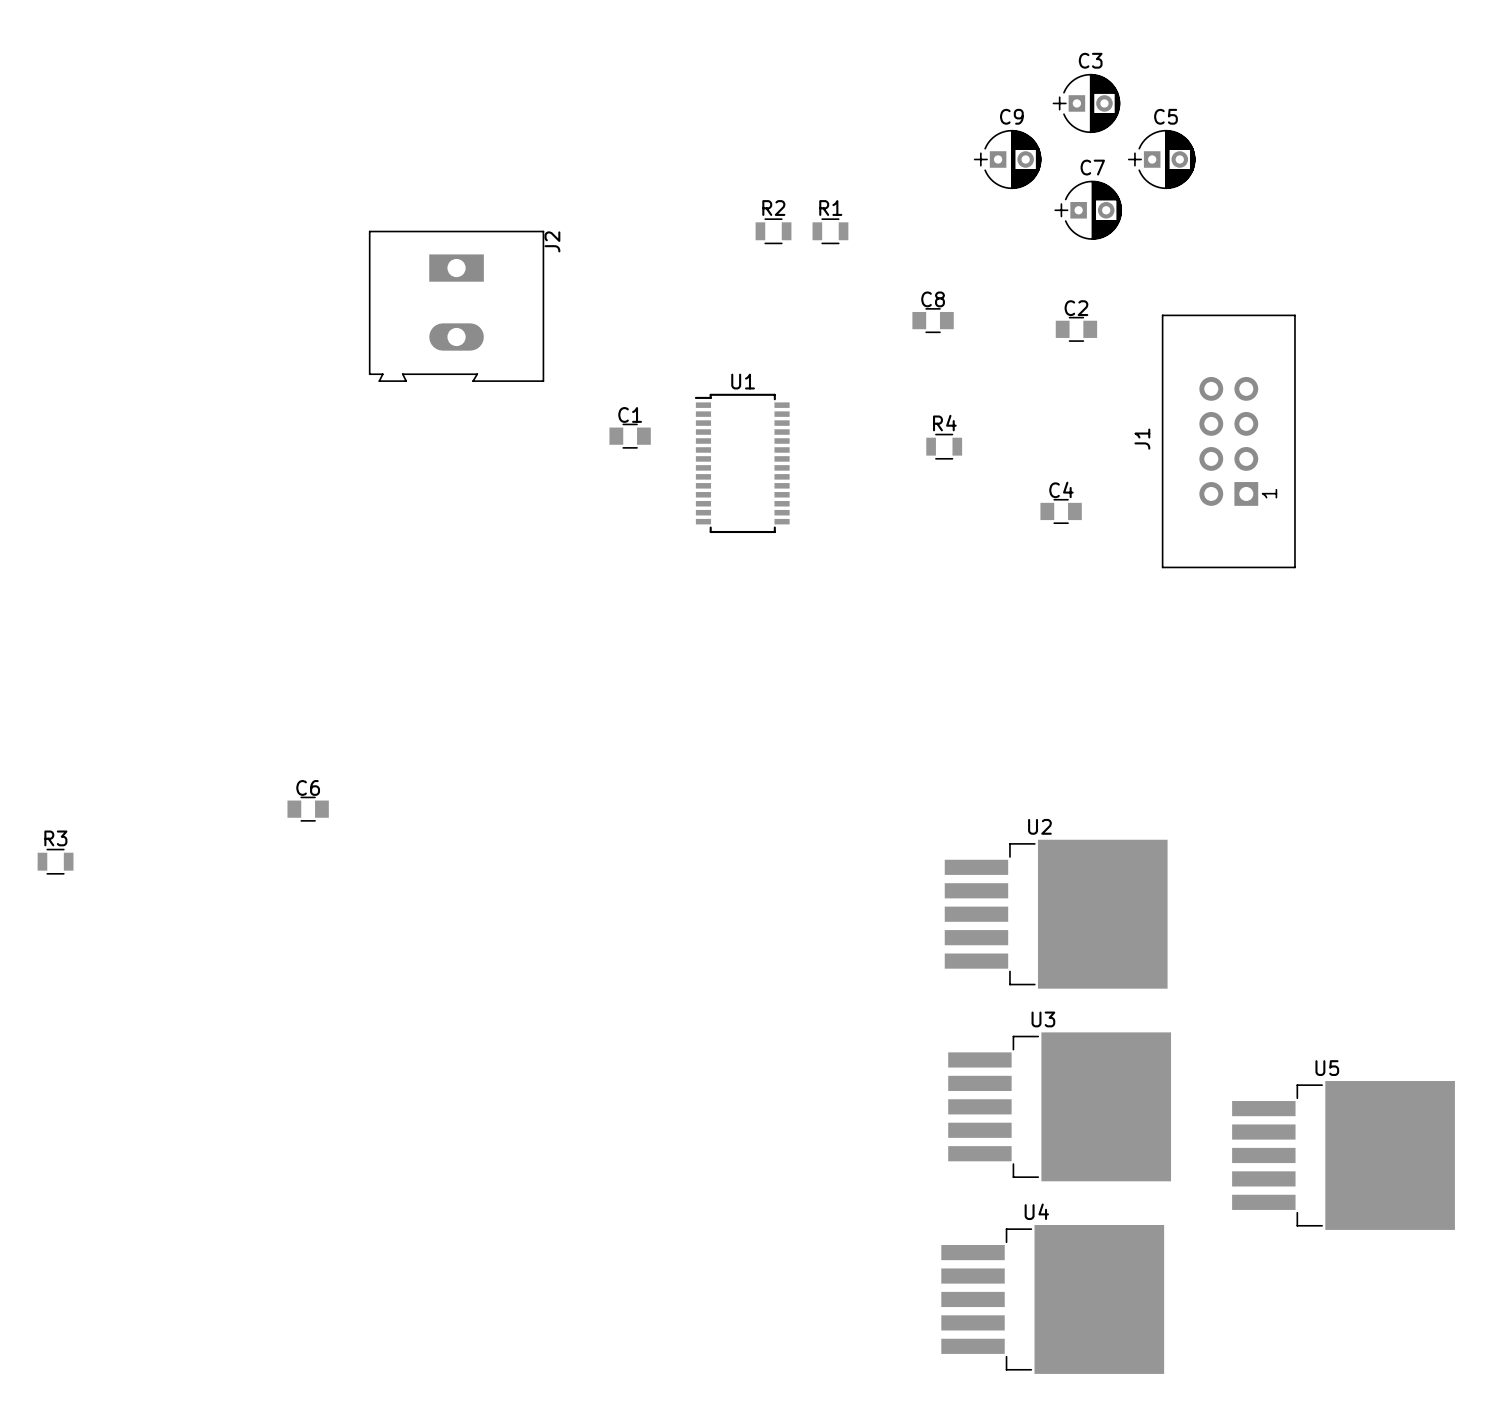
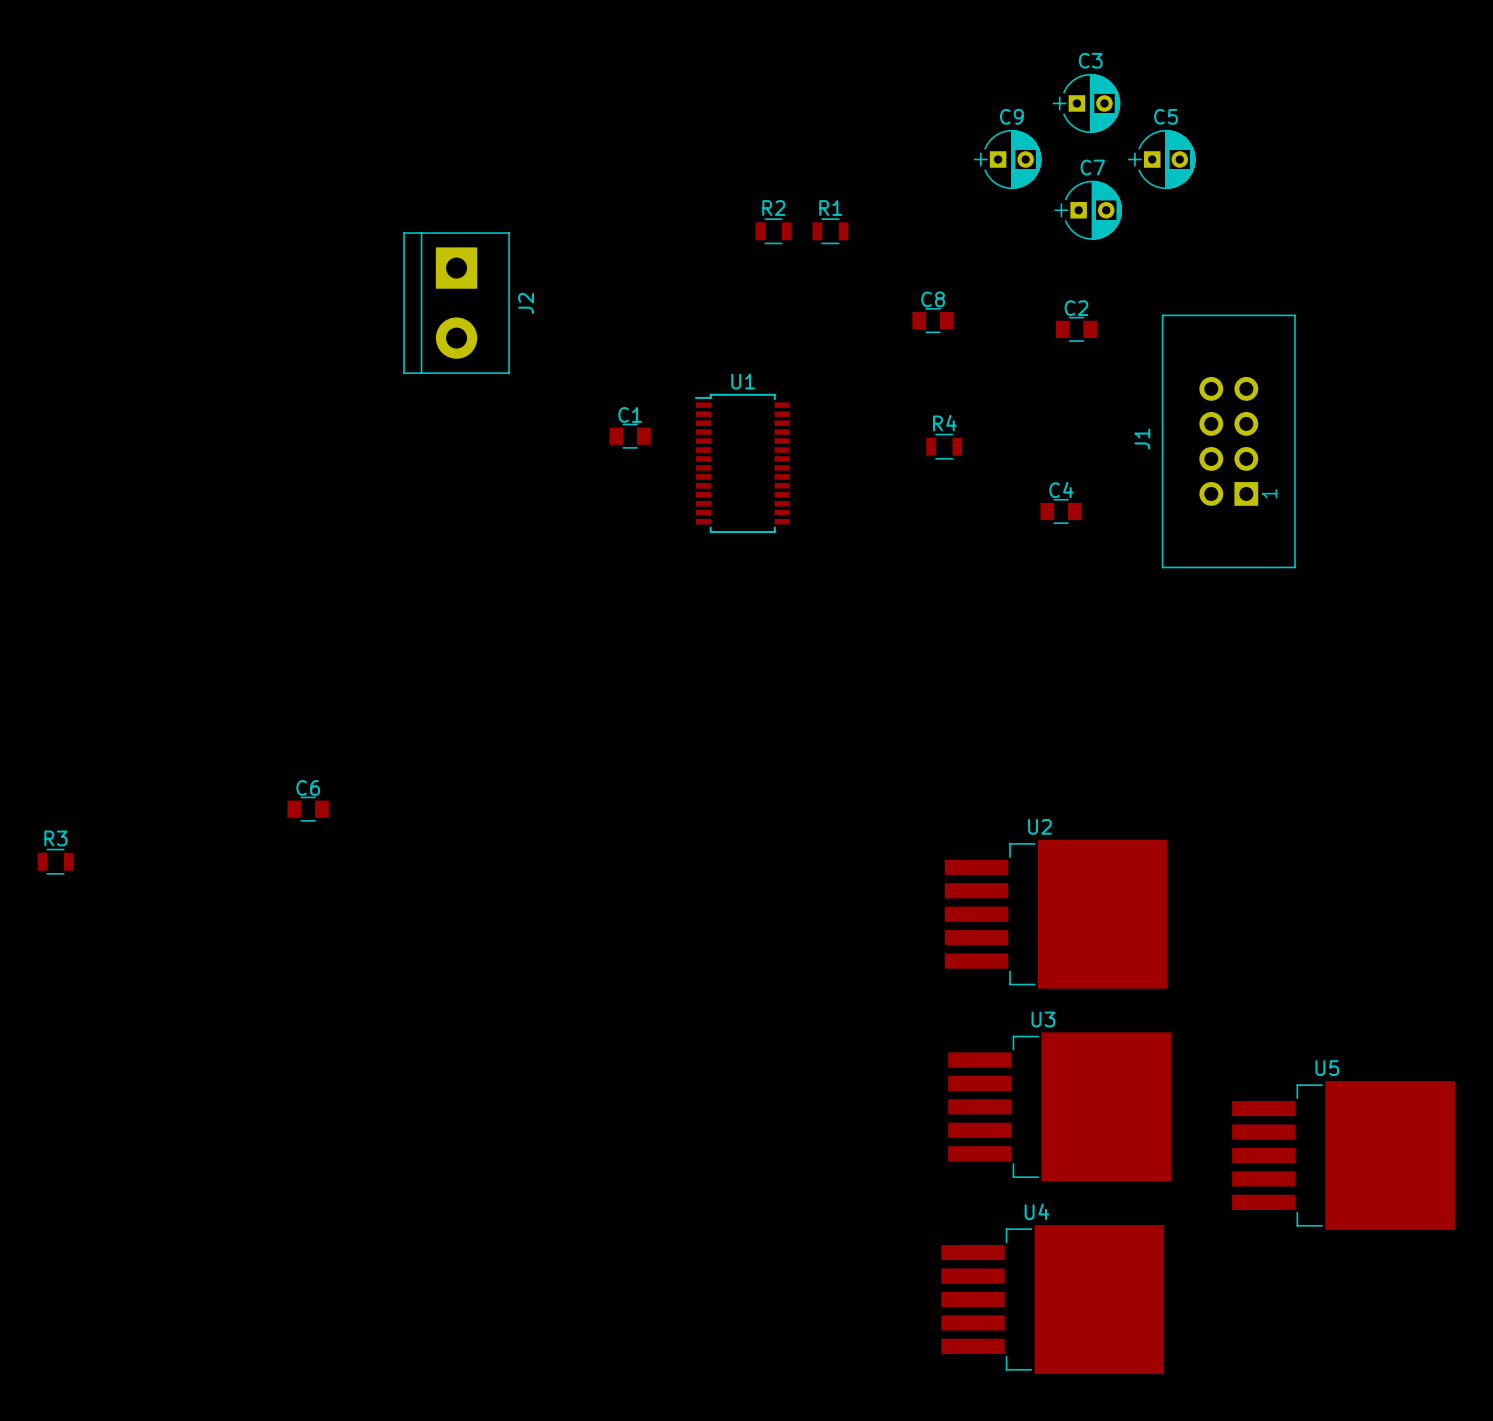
J2 footprint: [368, 230, 545, 382] -> [403, 232, 510, 374]
J2 name position: J2 (552, 241) -> J2 (526, 303)

